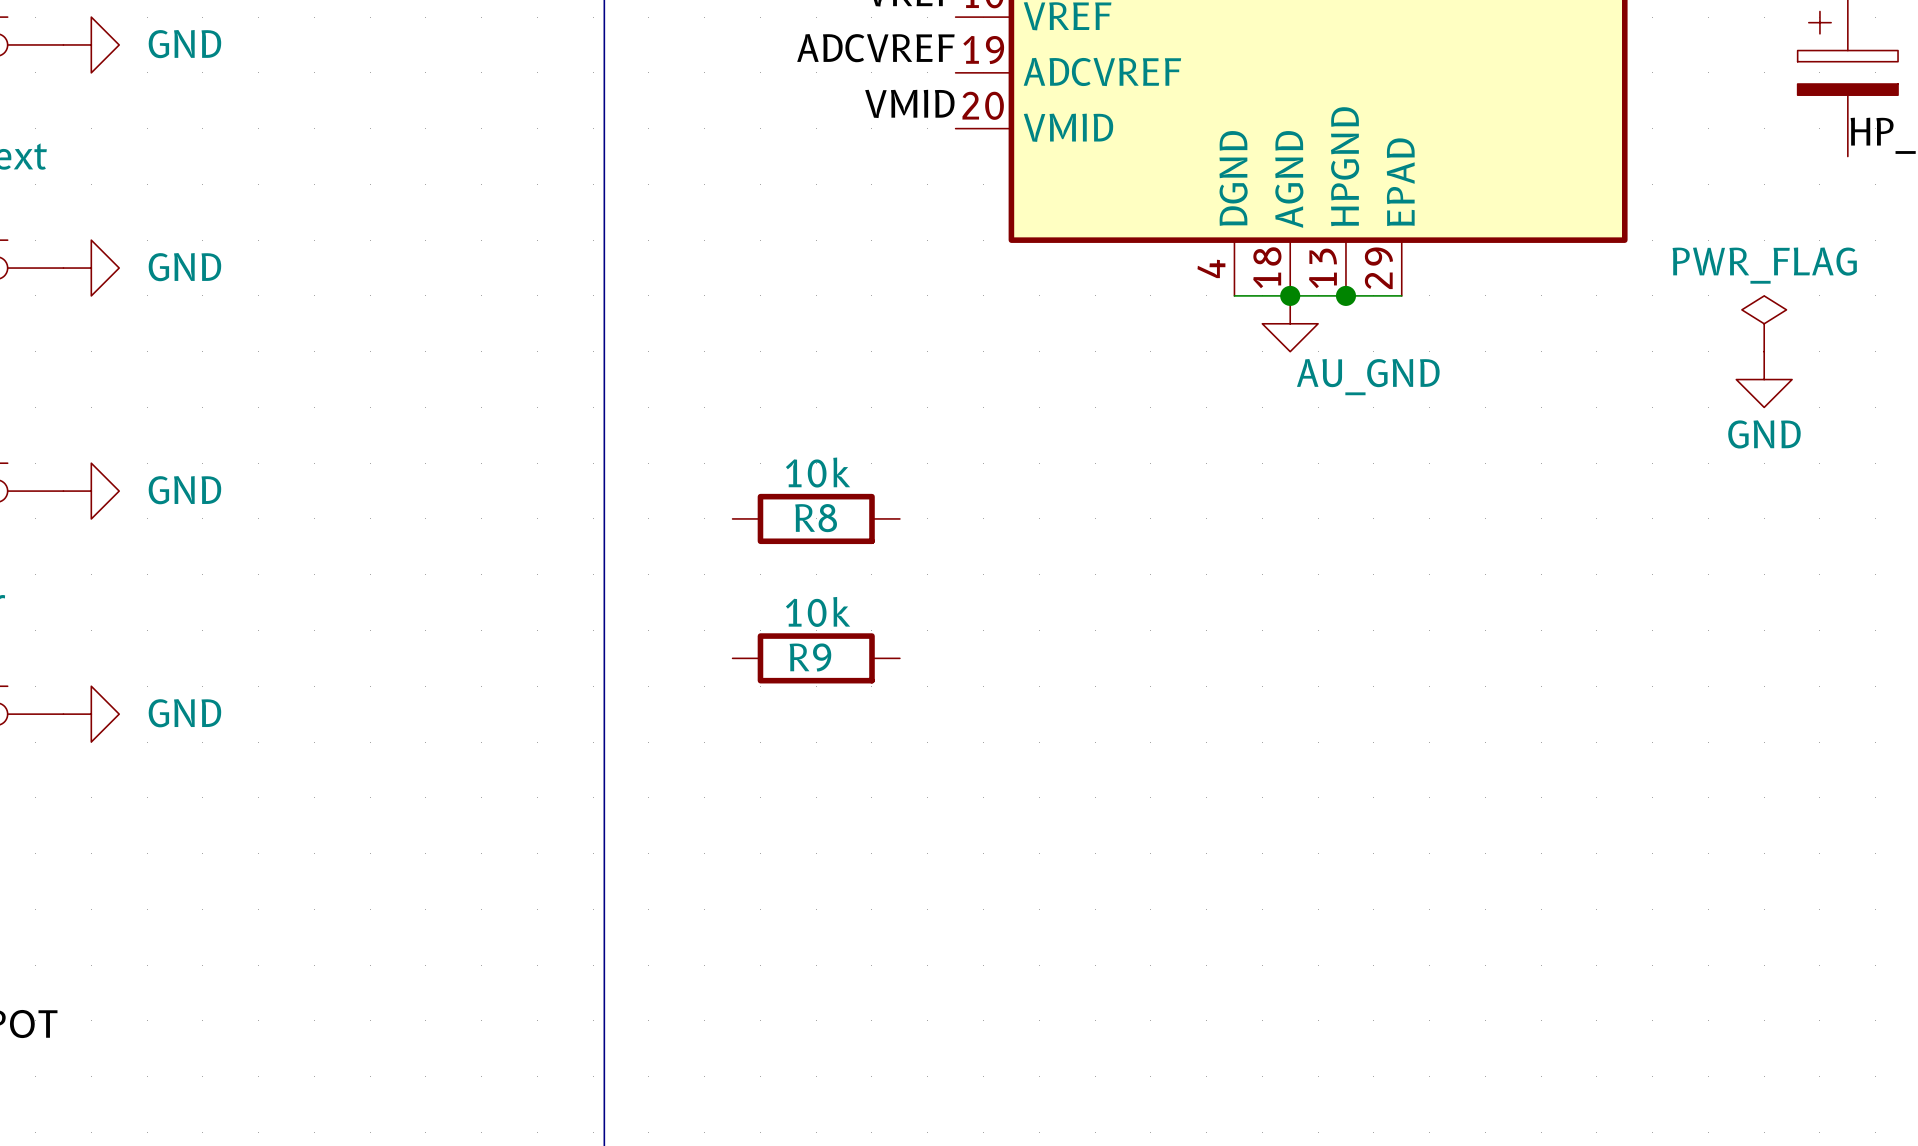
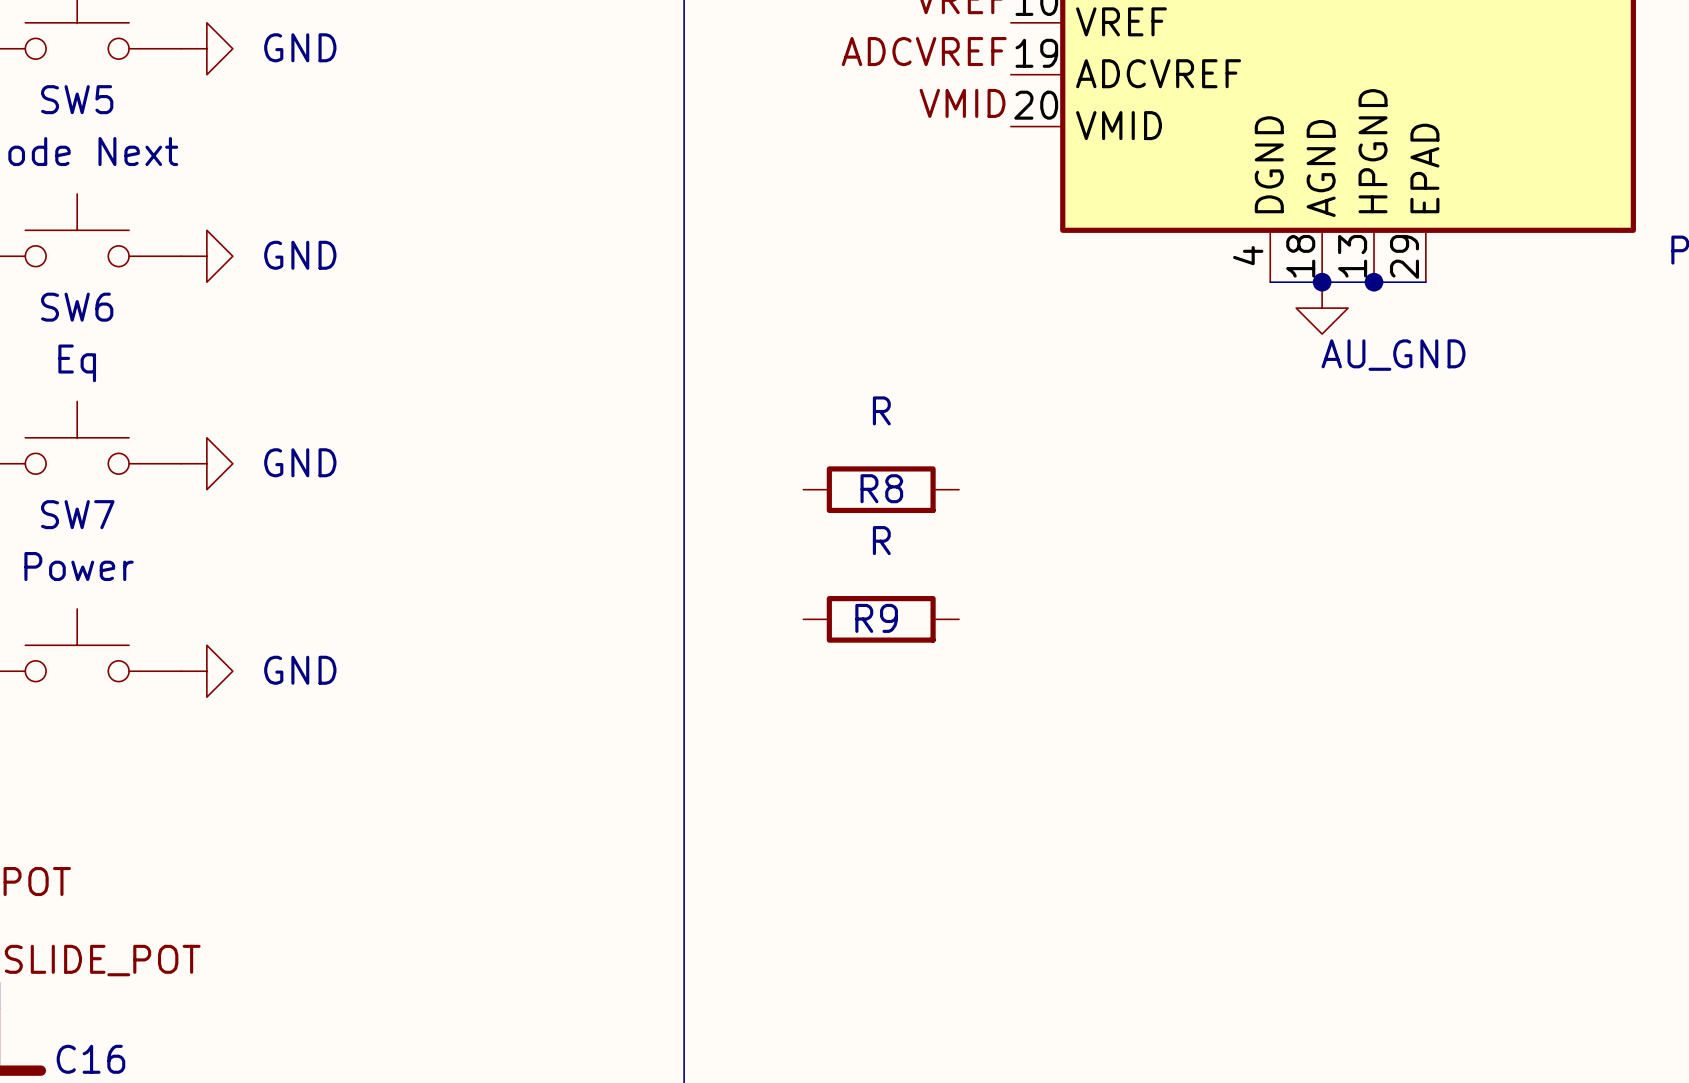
R8 value: 10k (818, 472) -> R (881, 410)
R9 value: 10k (818, 611) -> R (881, 540)

